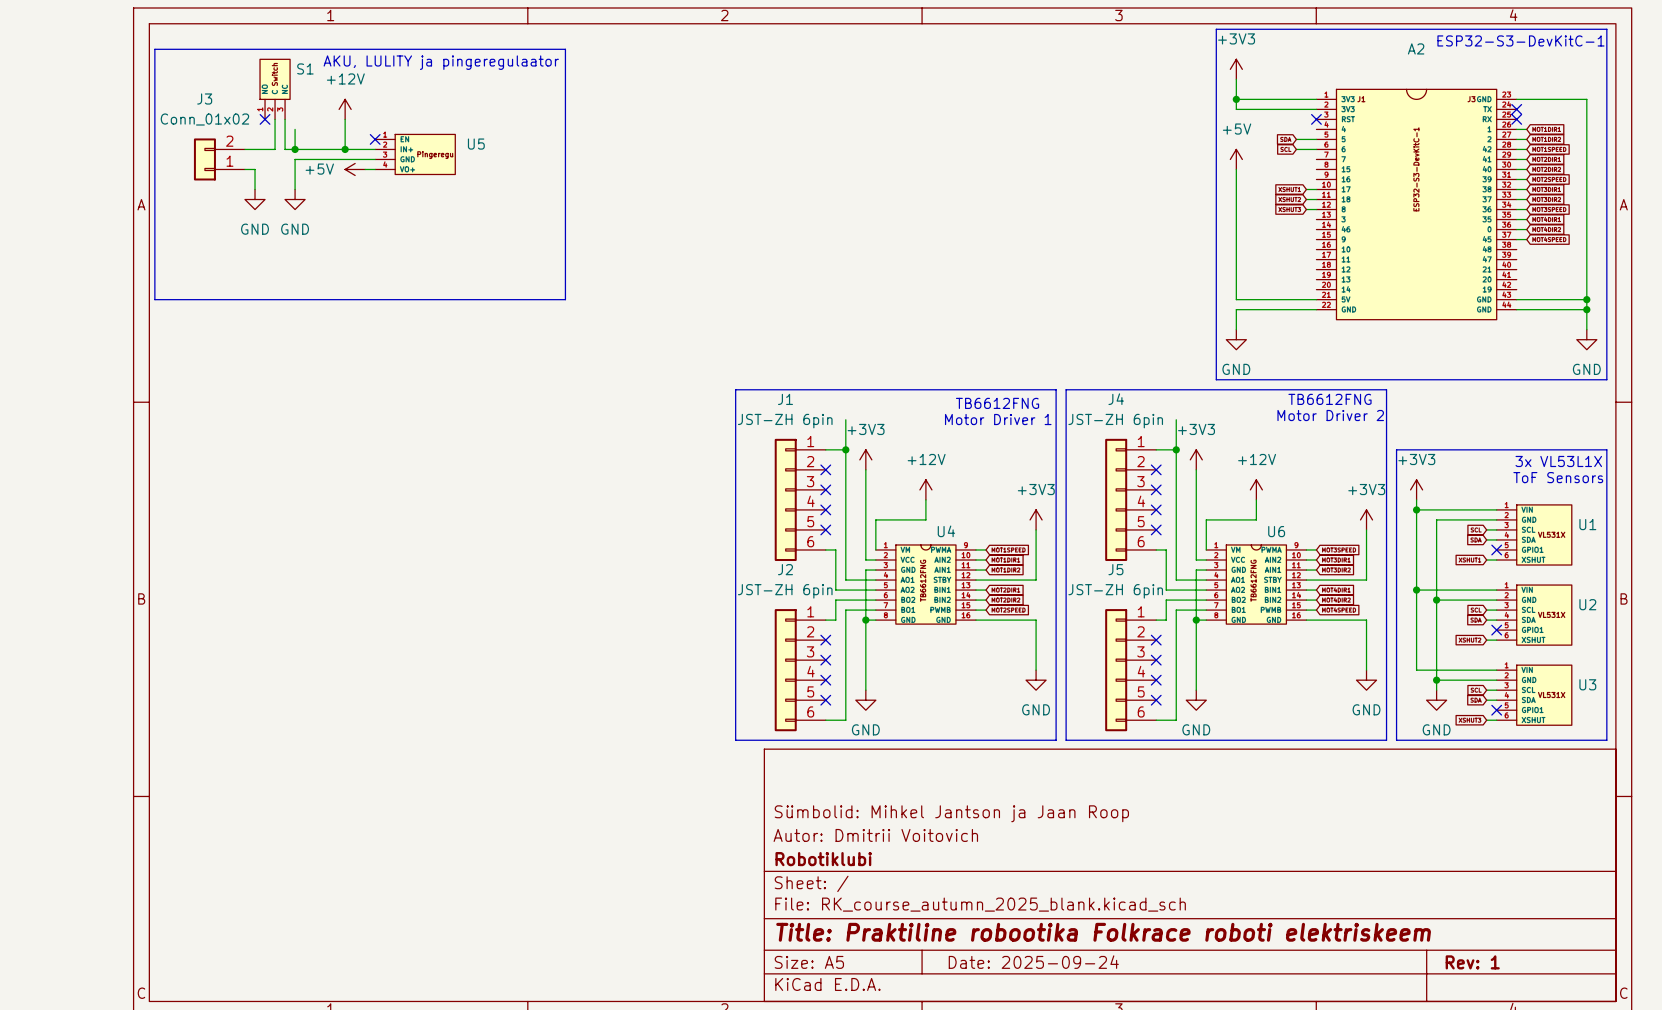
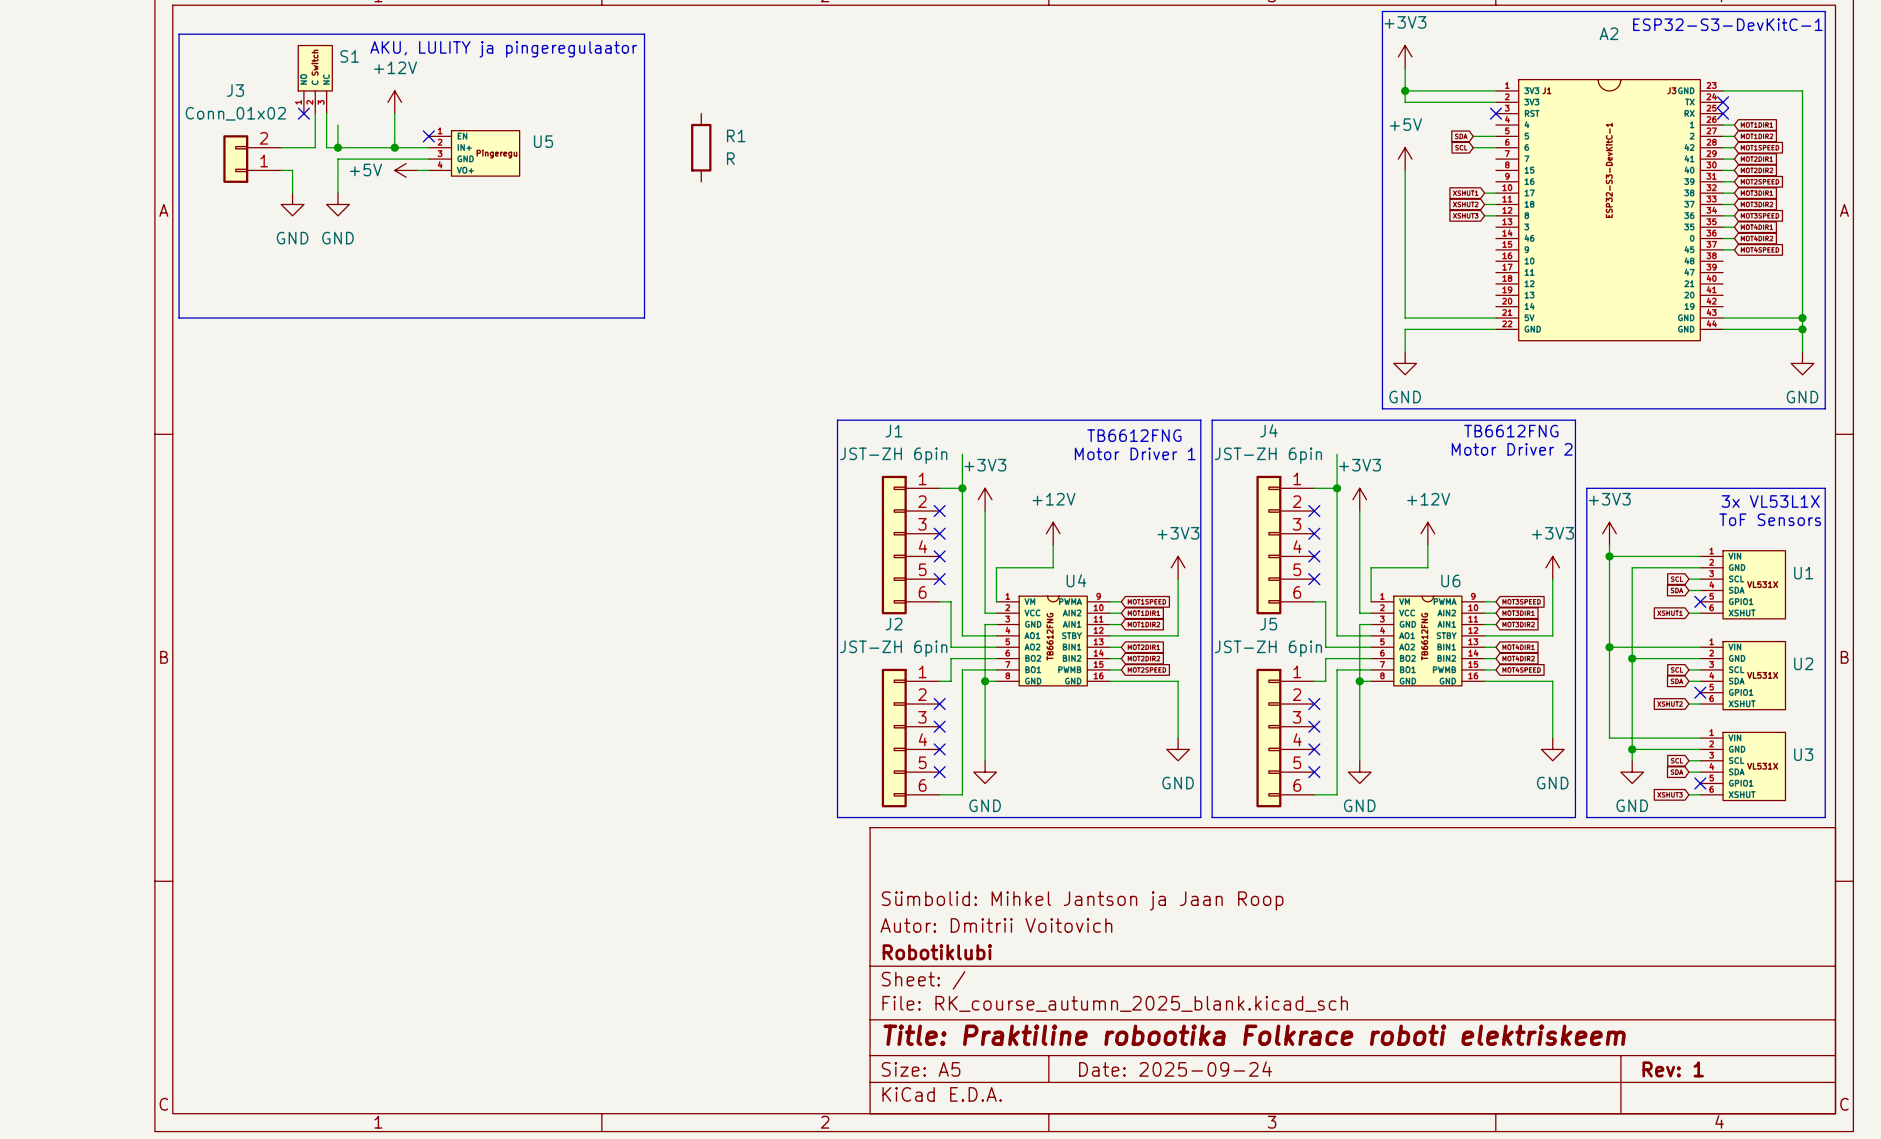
R1: none -> R (701, 147)

